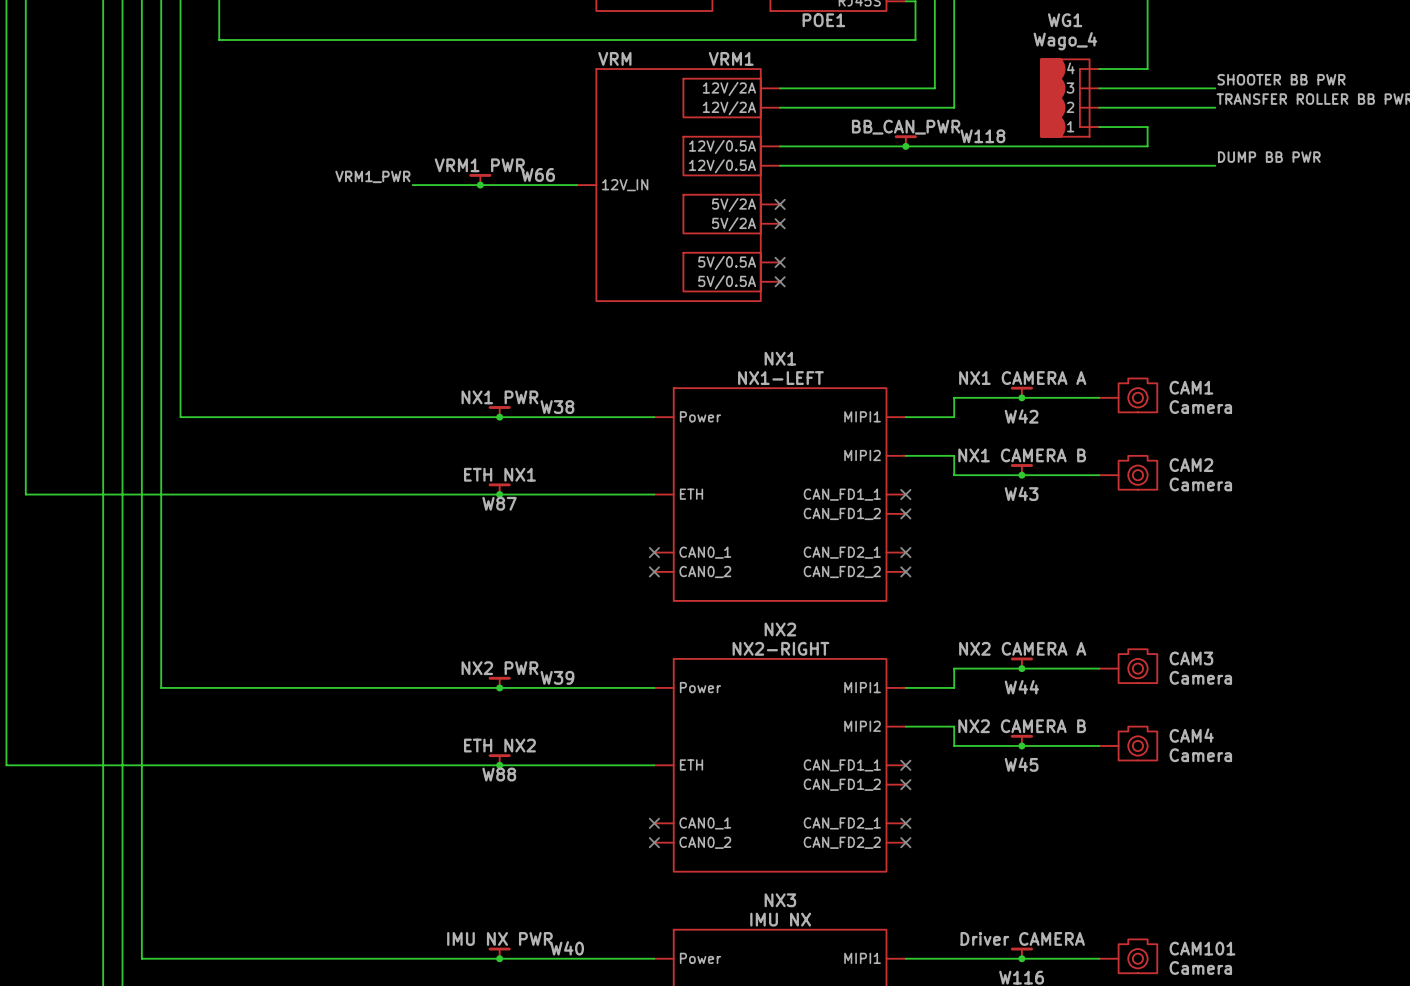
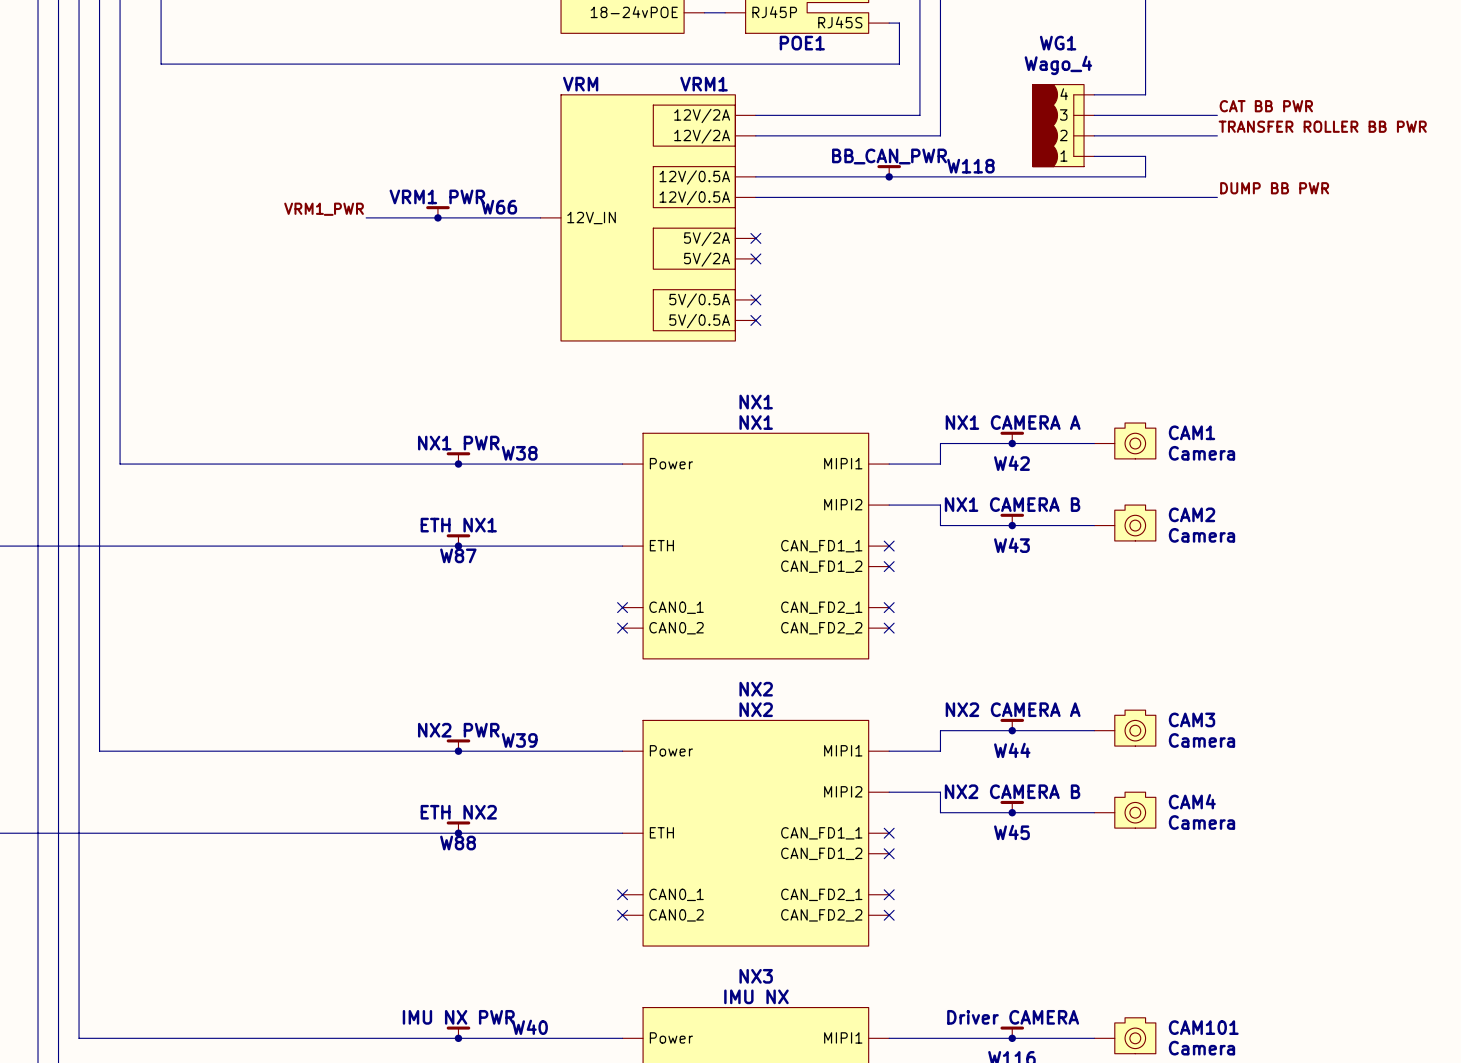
label: SHOOTER BB PWR (1281, 79) -> CAT BB PWR (1266, 106)
NX1 value: NX1-LEFT (780, 378) -> NX1 (756, 422)
NX2 value: NX2-RIGHT (780, 648) -> NX2 (756, 709)

